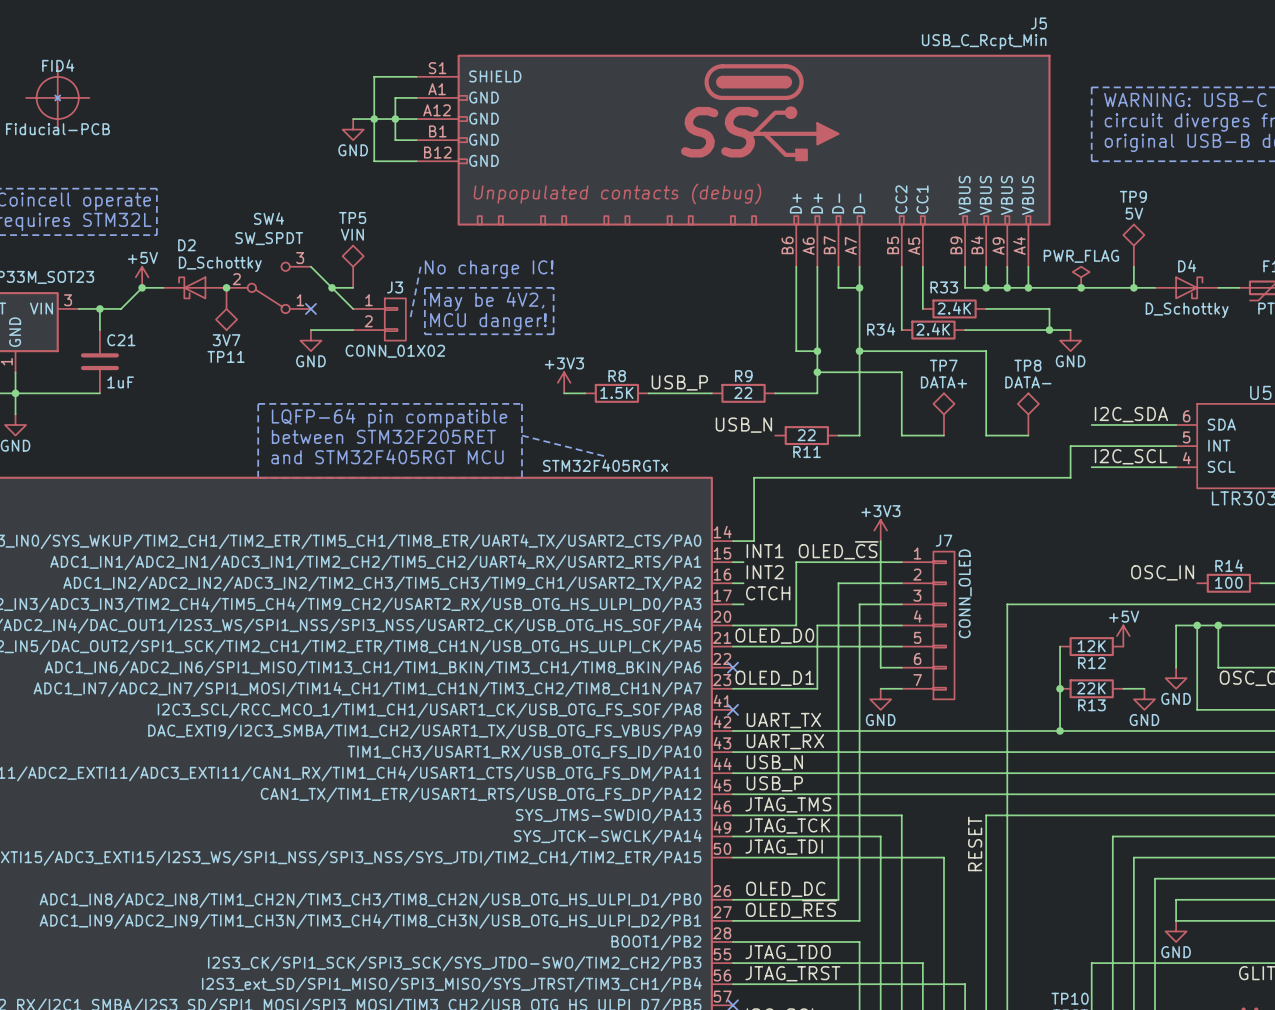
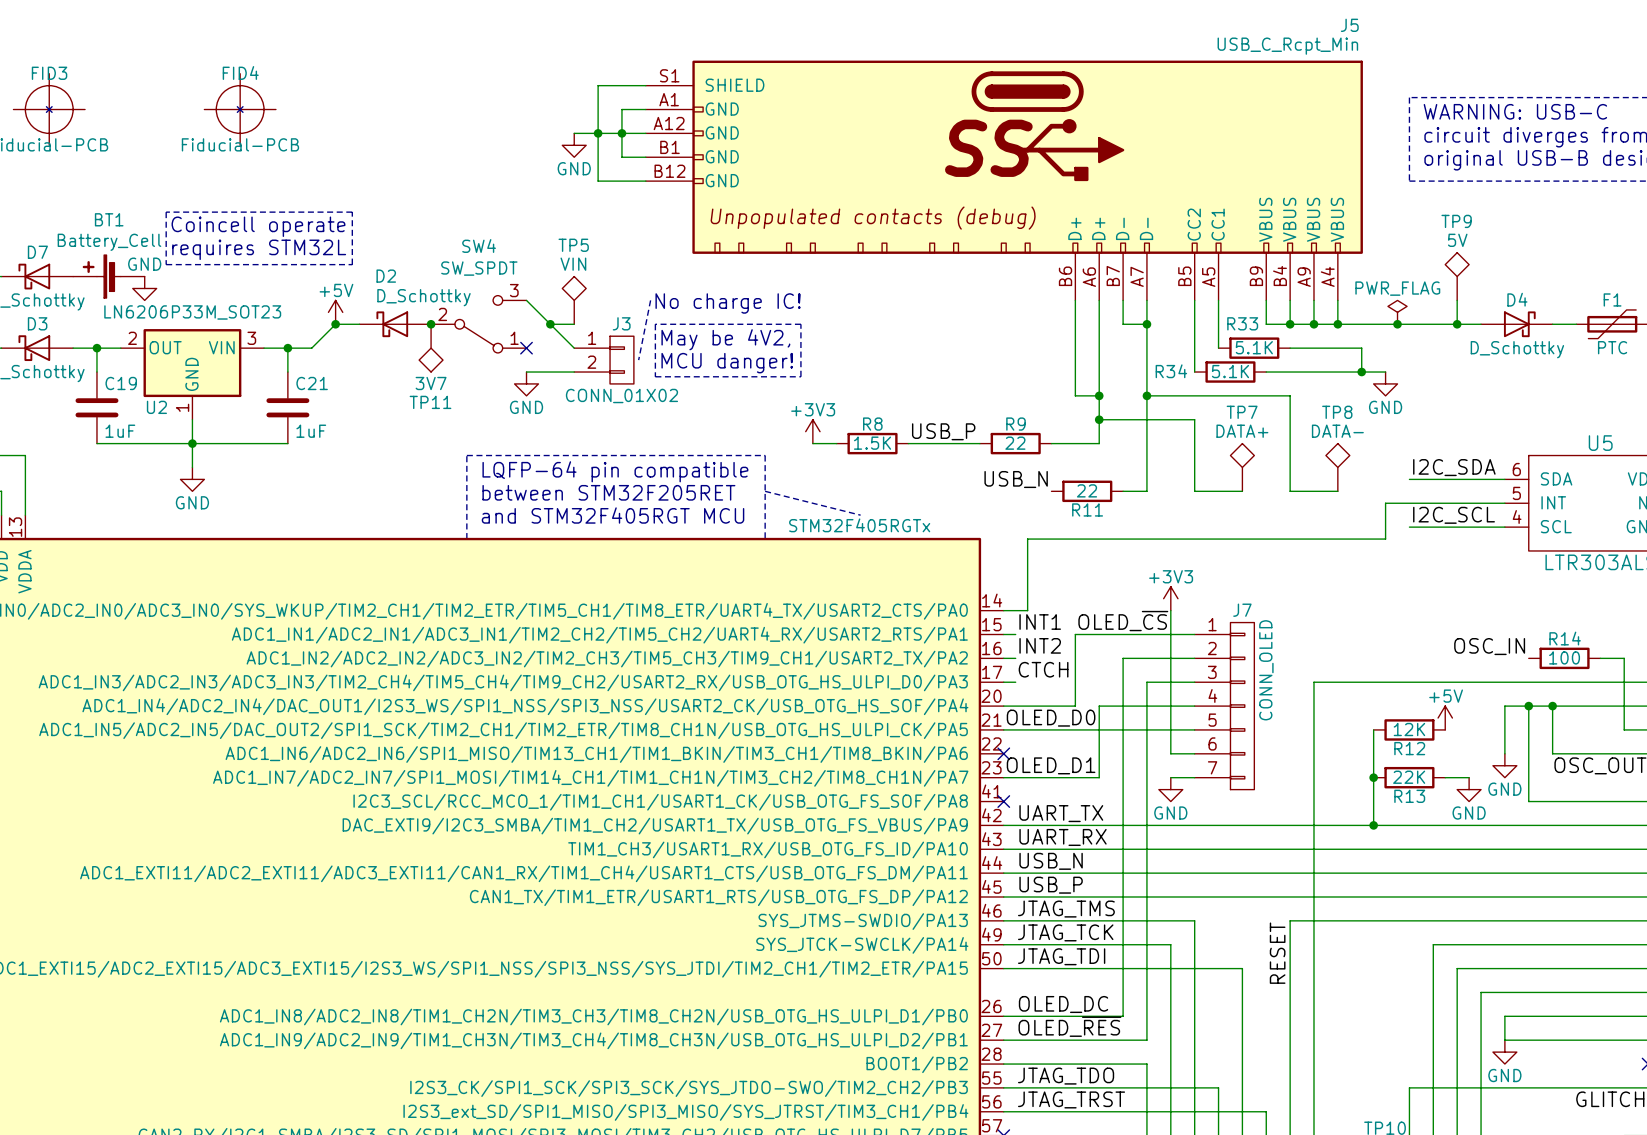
R33 value: 2.4K (954, 308) -> 5.1K (1254, 347)
R34 value: 2.4K (933, 329) -> 5.1K (1230, 371)

